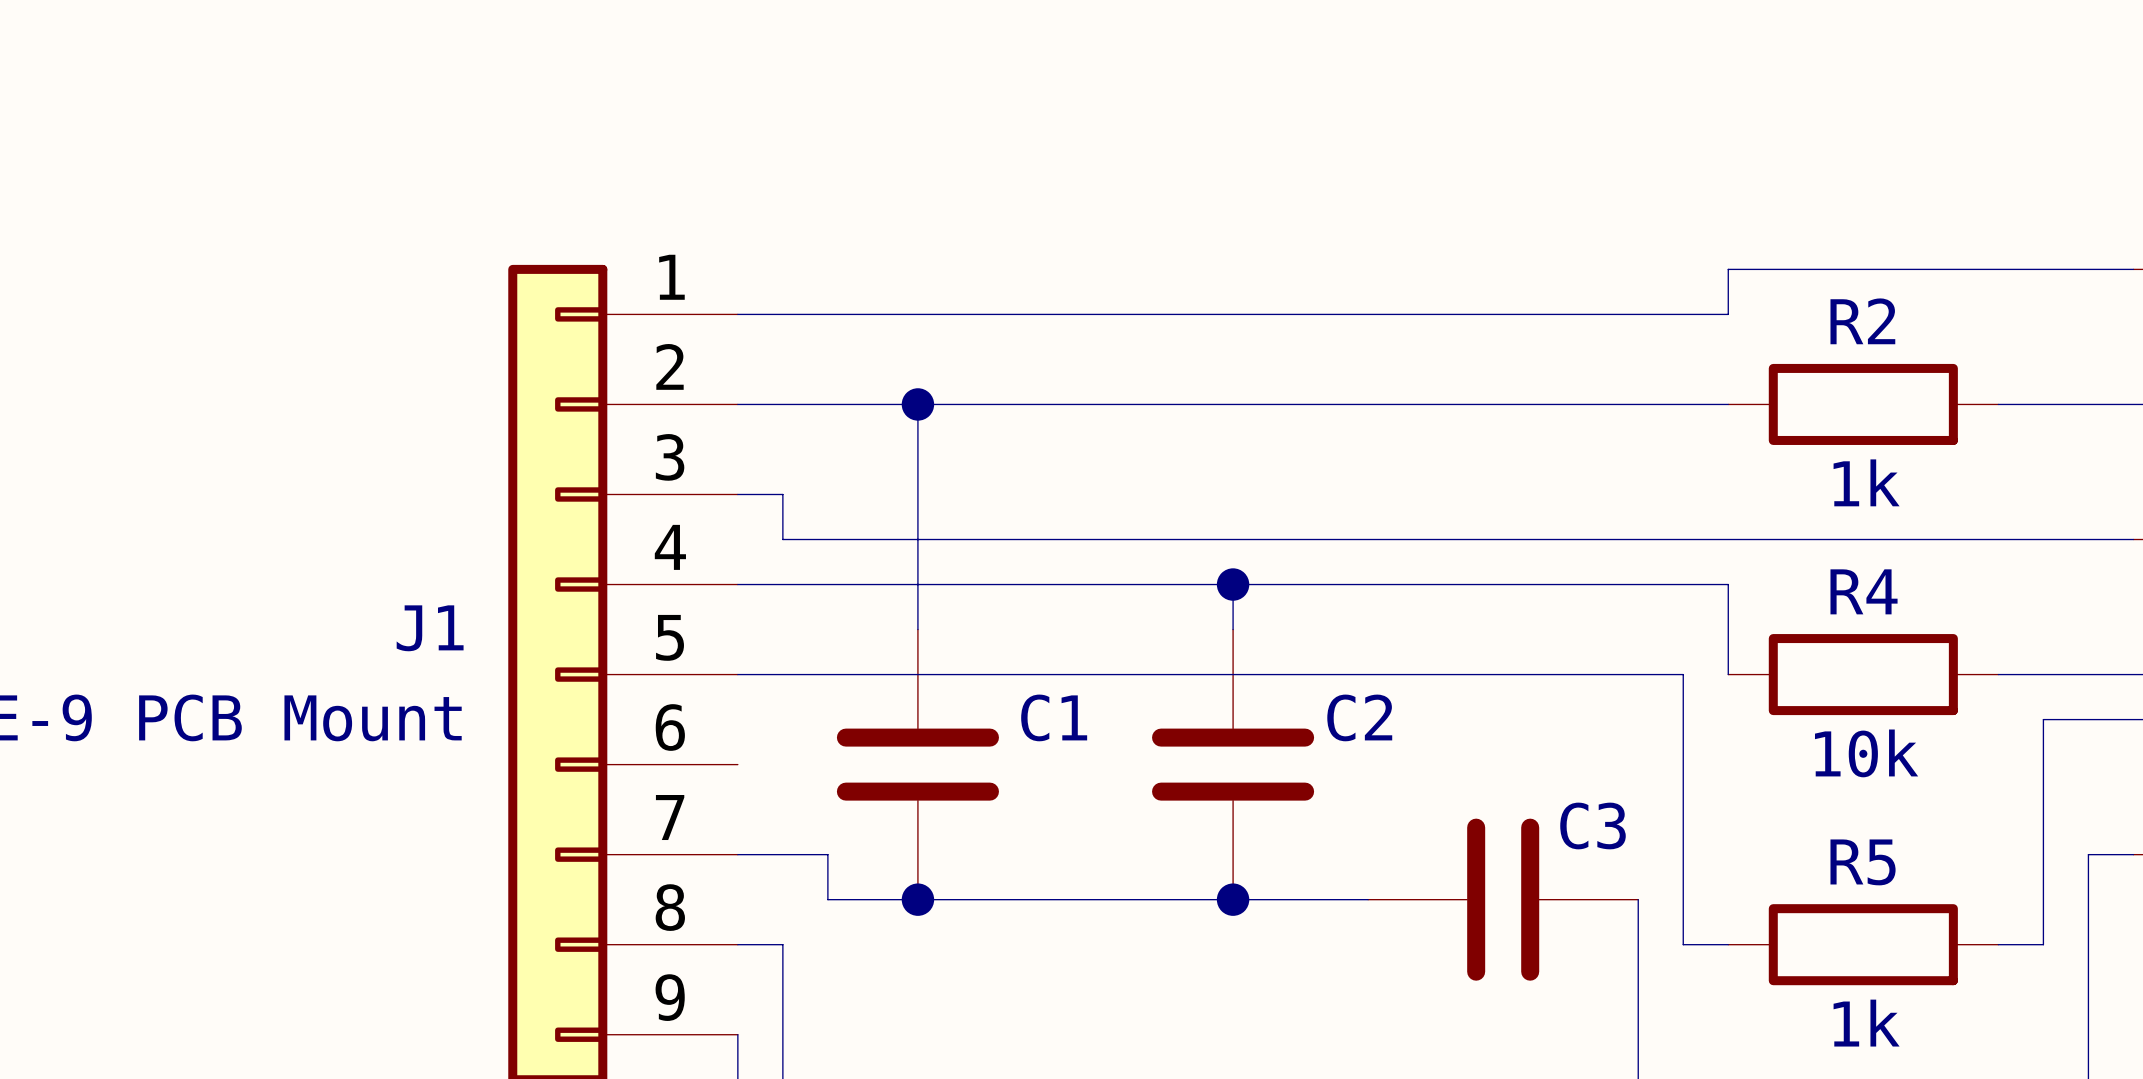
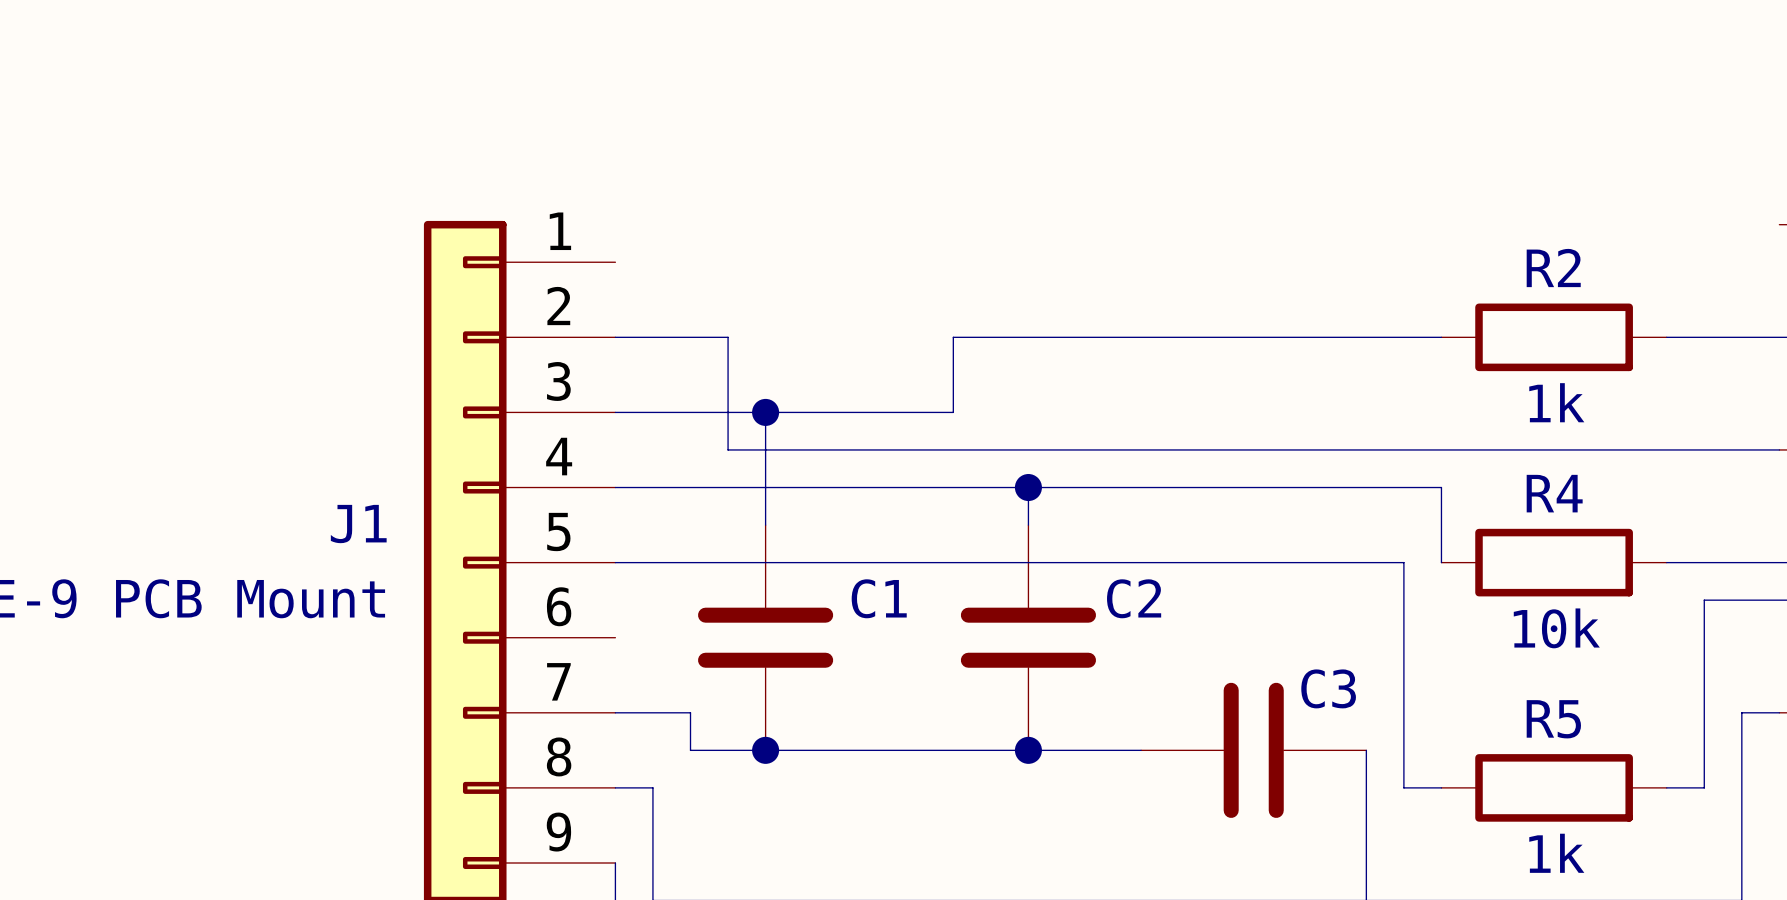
wire: (2133, 269) (1728, 269) (1728, 314) (737, 314) -> none
wire: (872, 404) (1143, 404) -> (652, 412) (953, 412) (953, 337)
wire: (917, 404) (917, 494) -> none
junction position: (917, 404) -> (765, 412)
wire: (782, 494) (782, 539) (872, 539) -> (728, 337) (728, 449)

